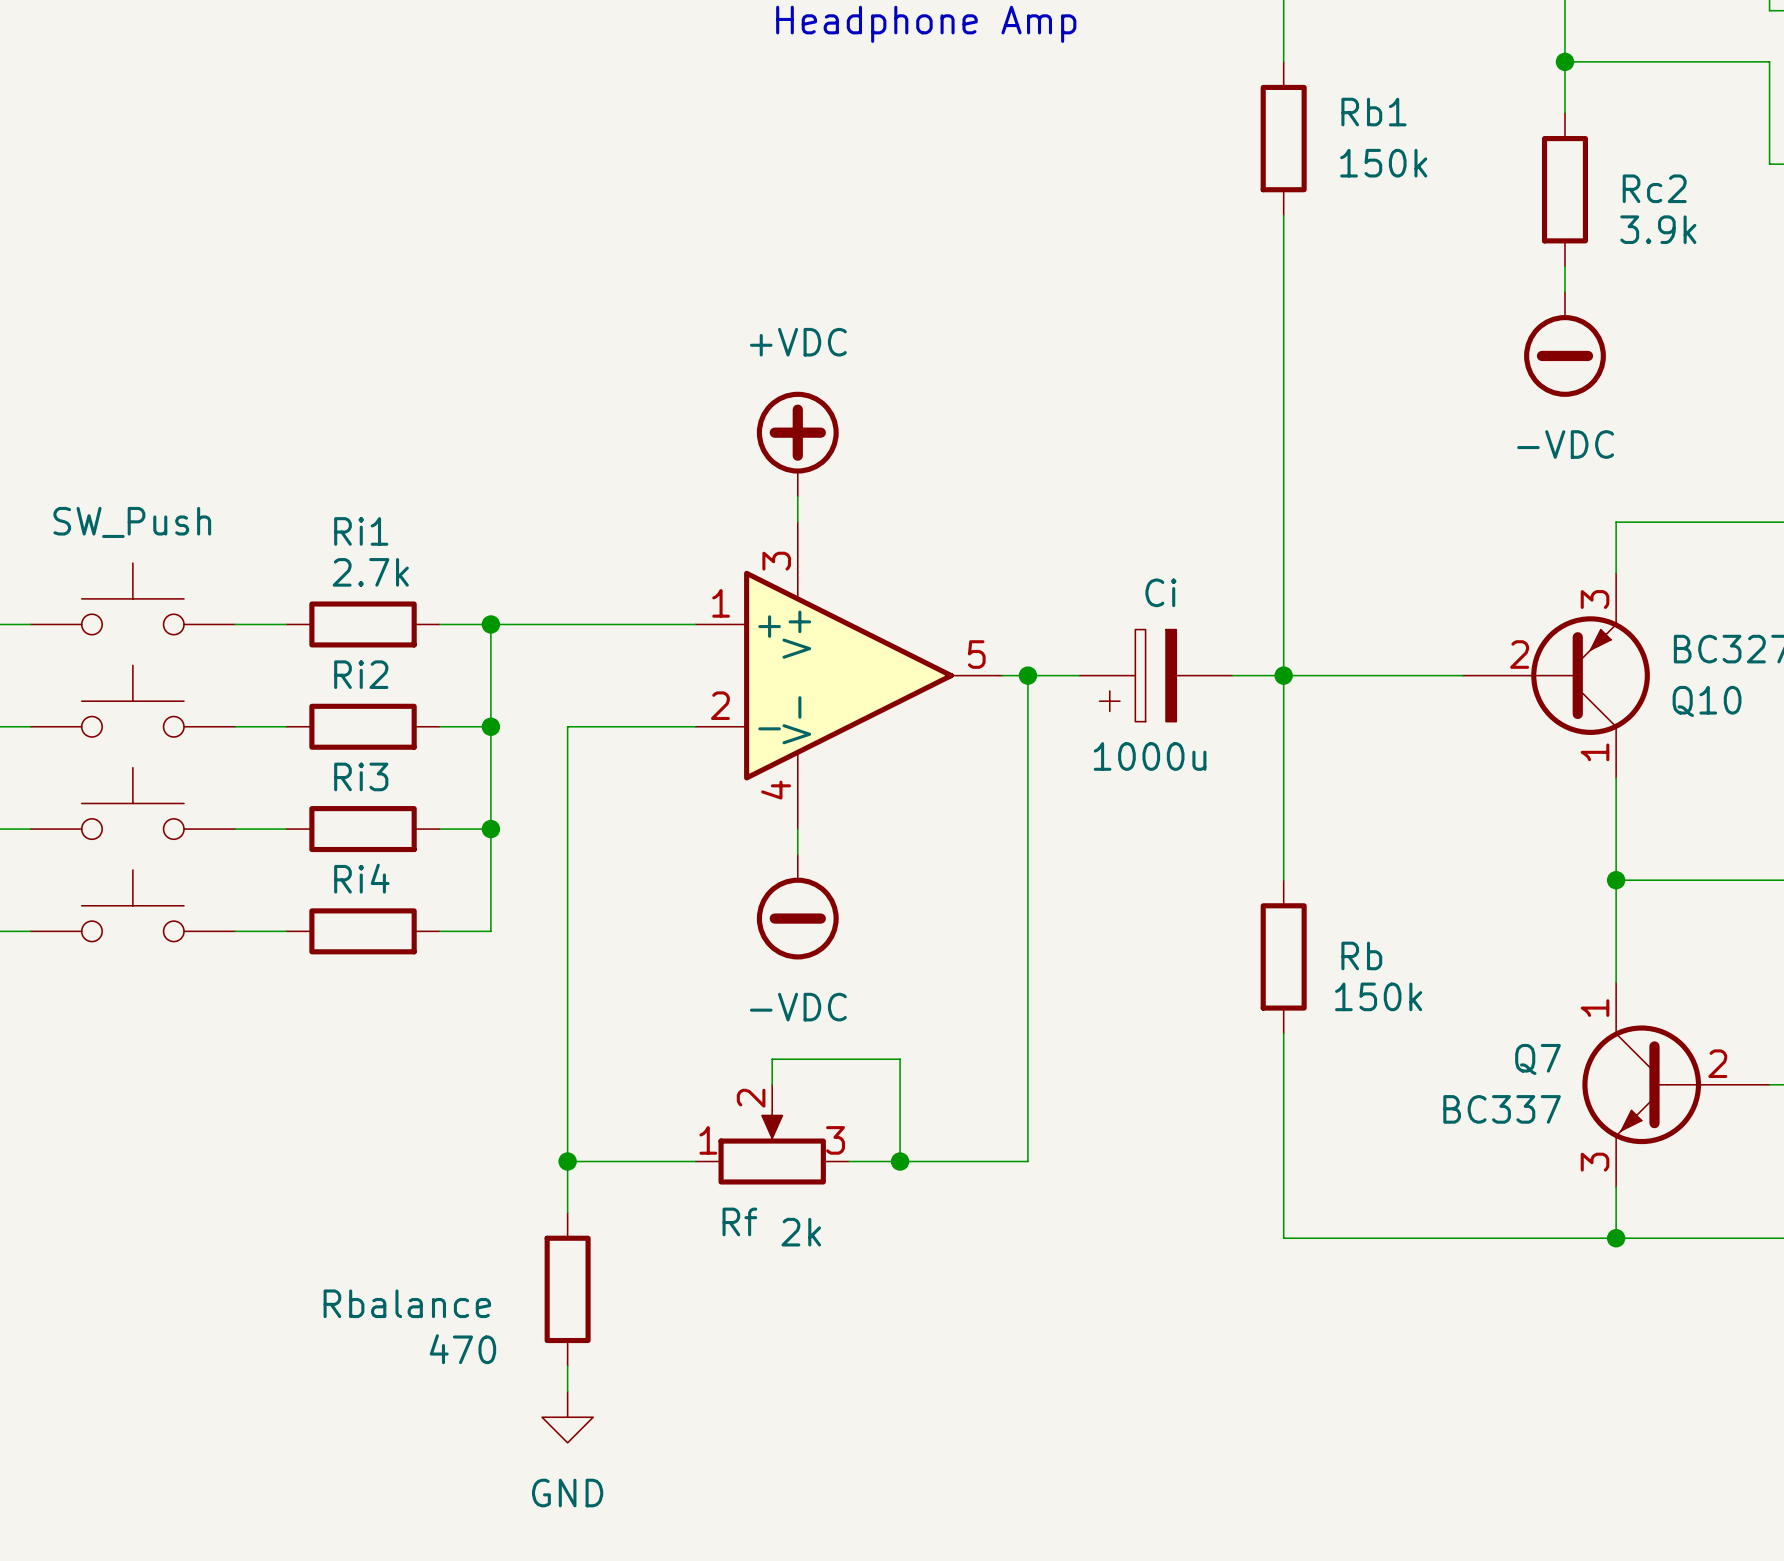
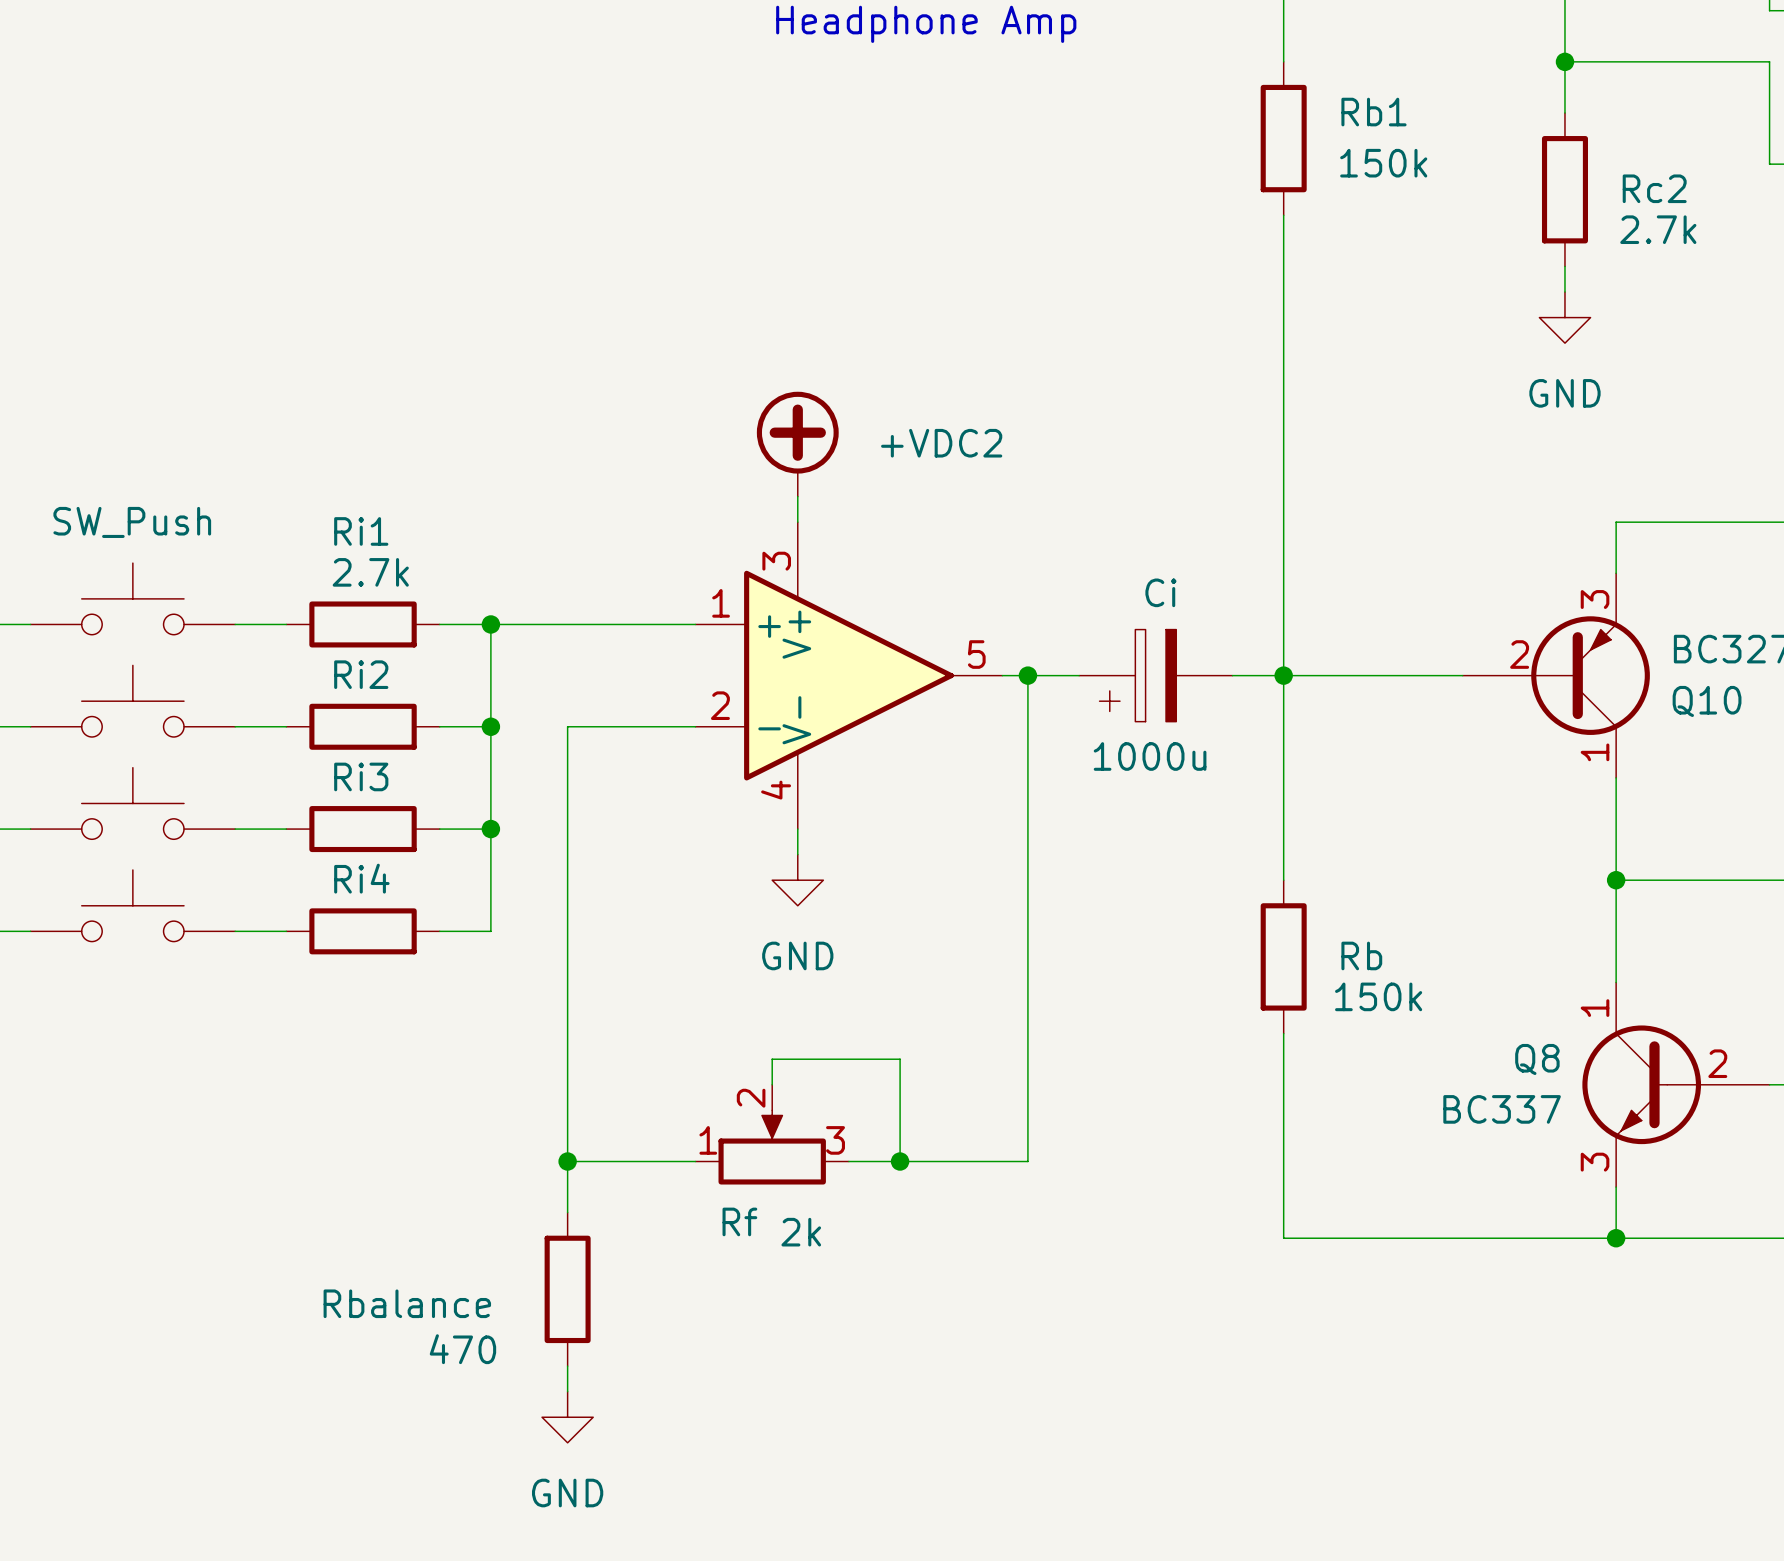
Rc2 value: 3.9k (1658, 229) -> 2.7k (1658, 229)
power symbol: none -> GND (1564, 317)
power symbol: -VDC (1564, 344) -> none
power symbol: +VDC (797, 444) -> +VDC2 (797, 444)
power symbol: none -> GND (797, 880)
power symbol: -VDC (797, 907) -> none
Q7 name: Q7 (1538, 1059) -> Q8 (1537, 1059)

